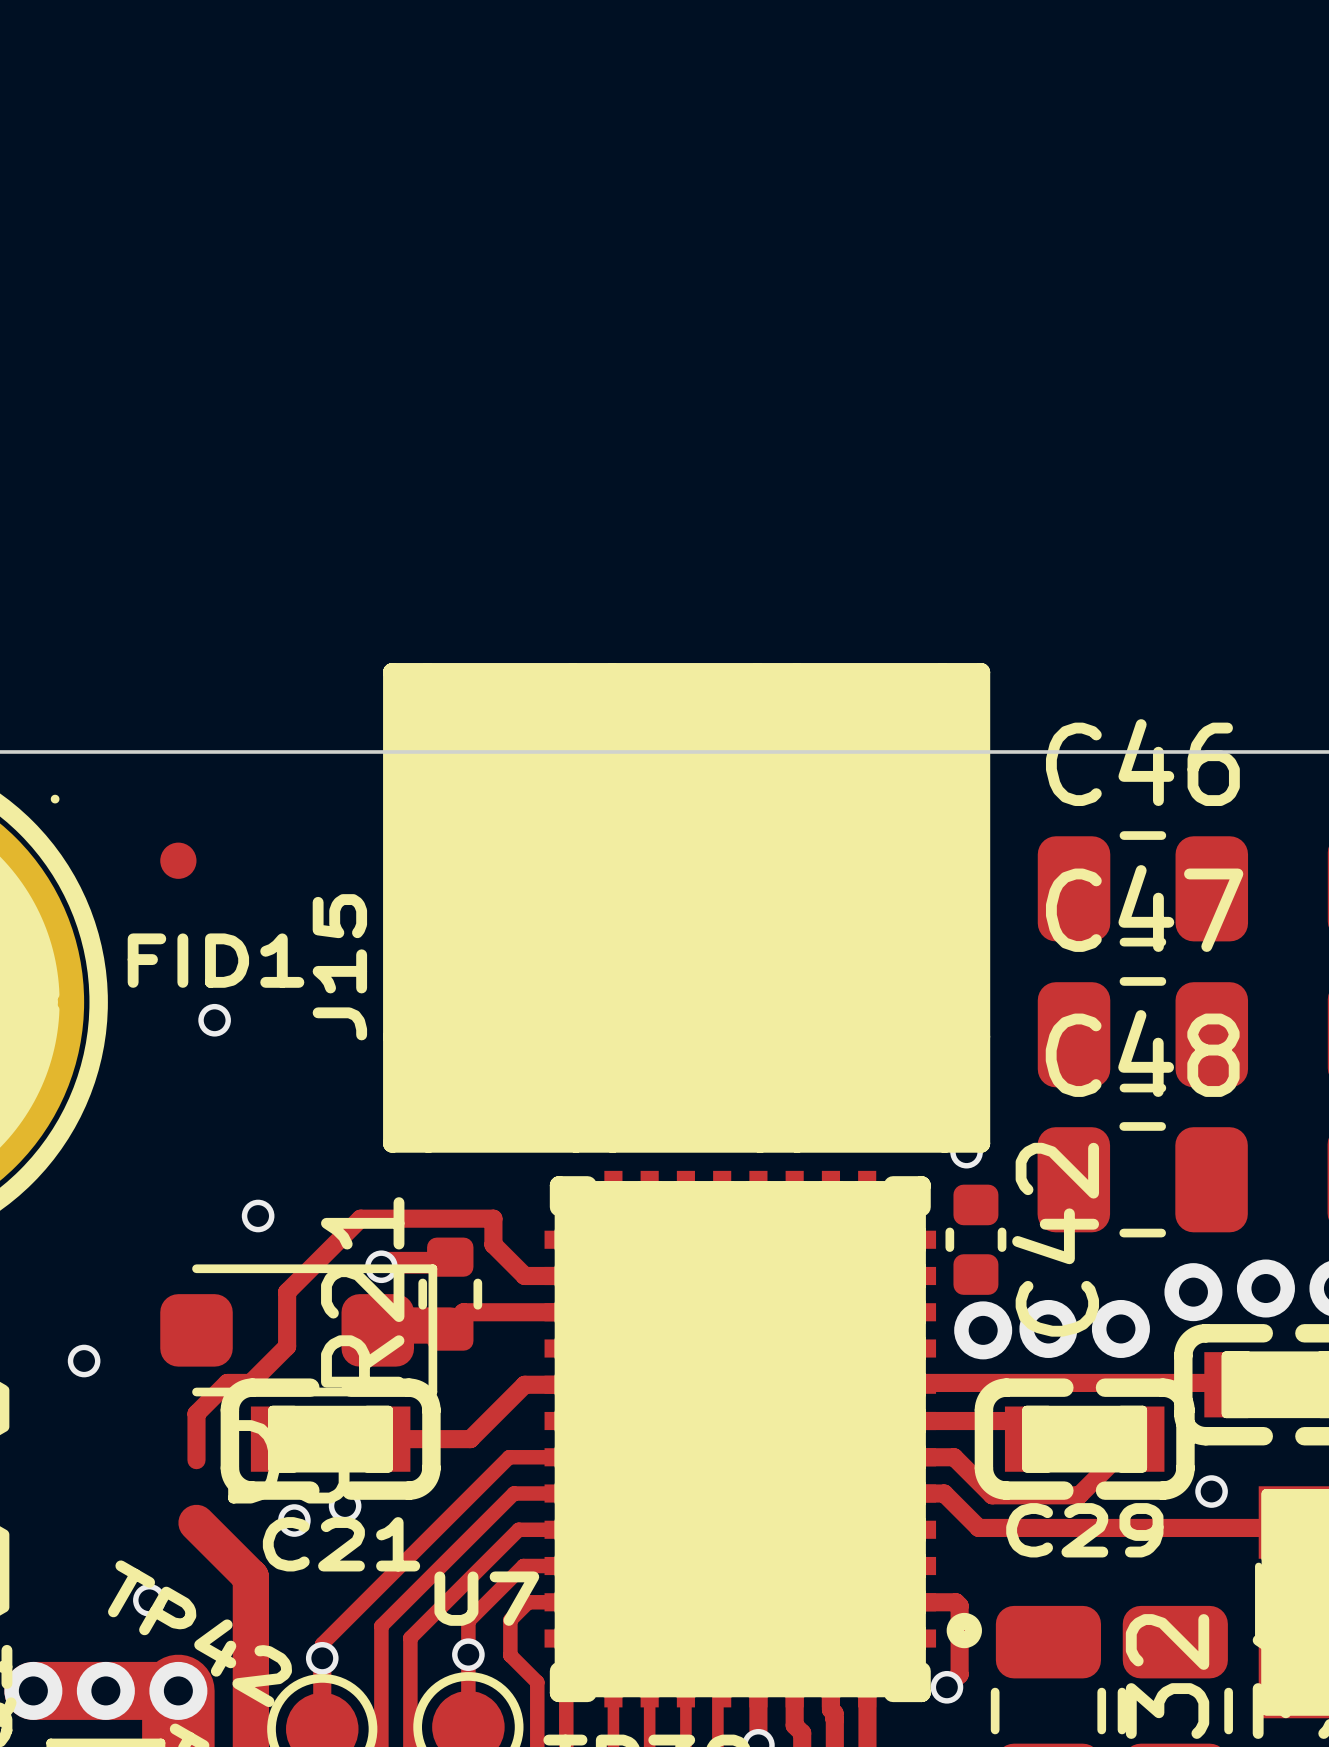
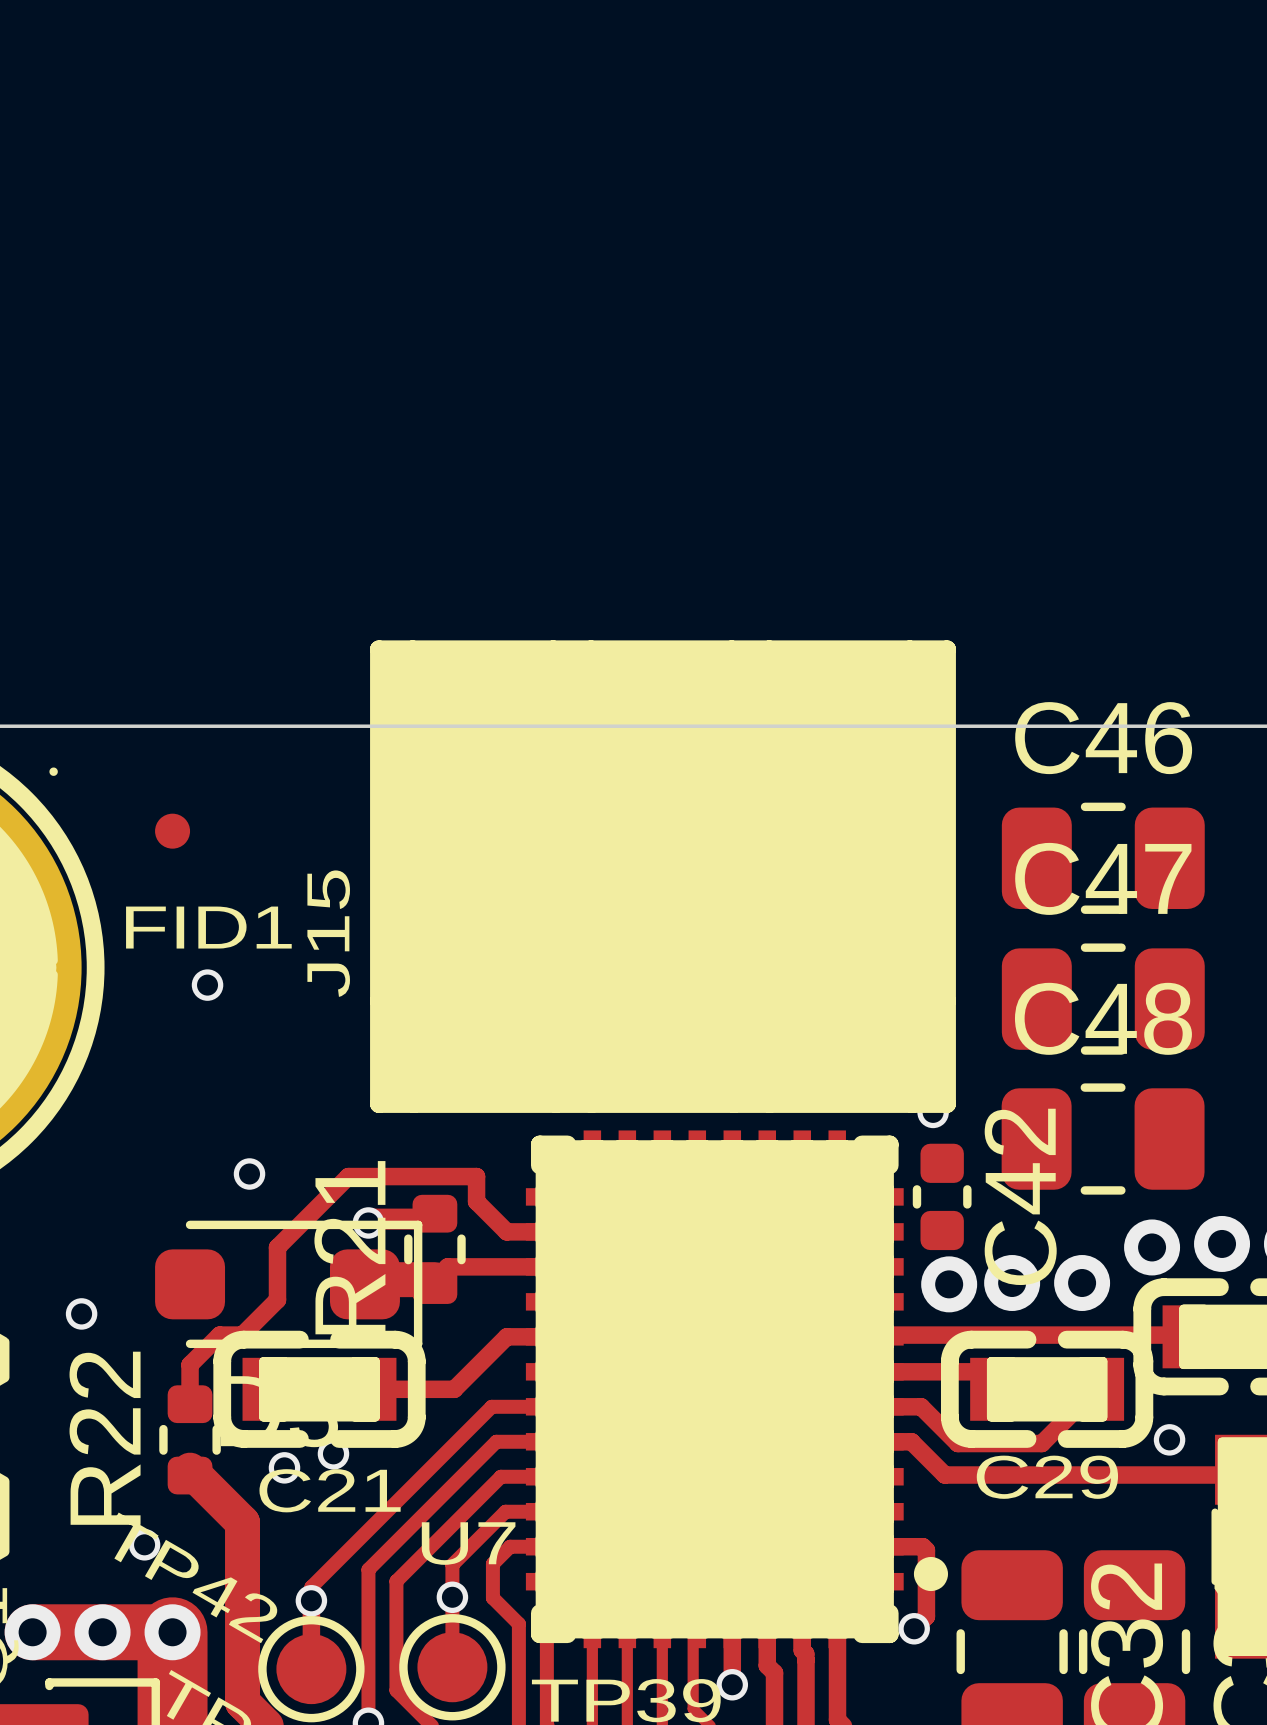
R22: none -> (190, 1439)

